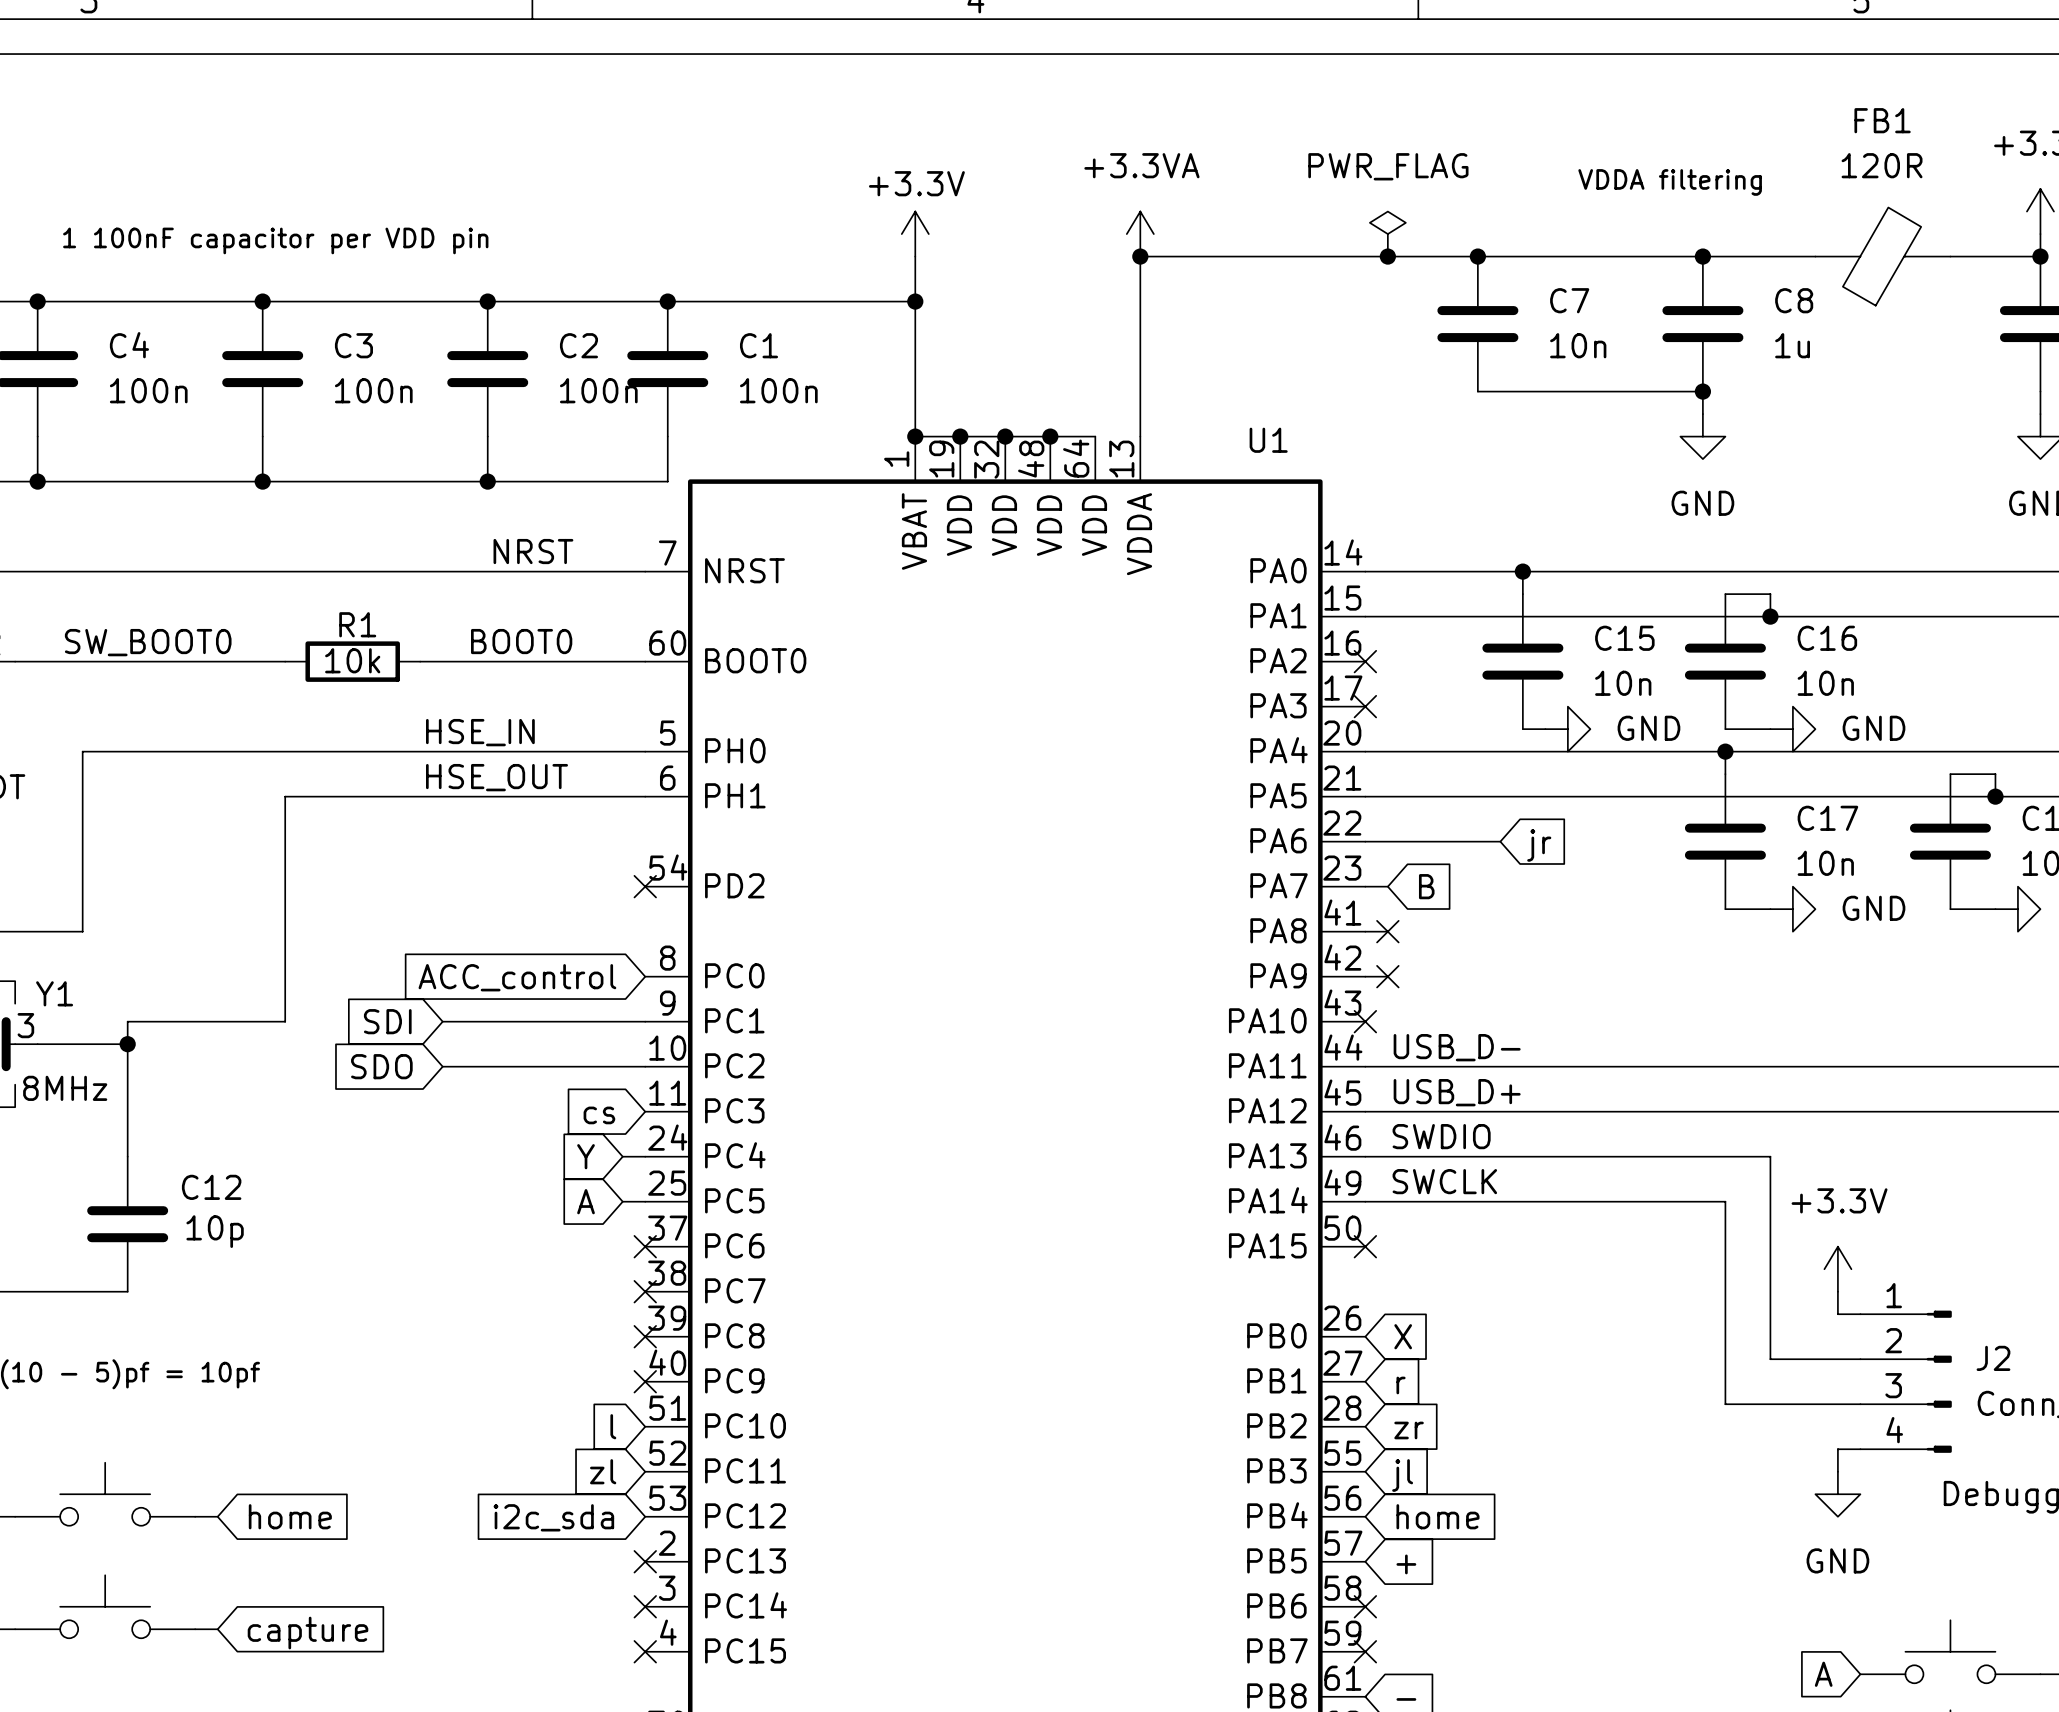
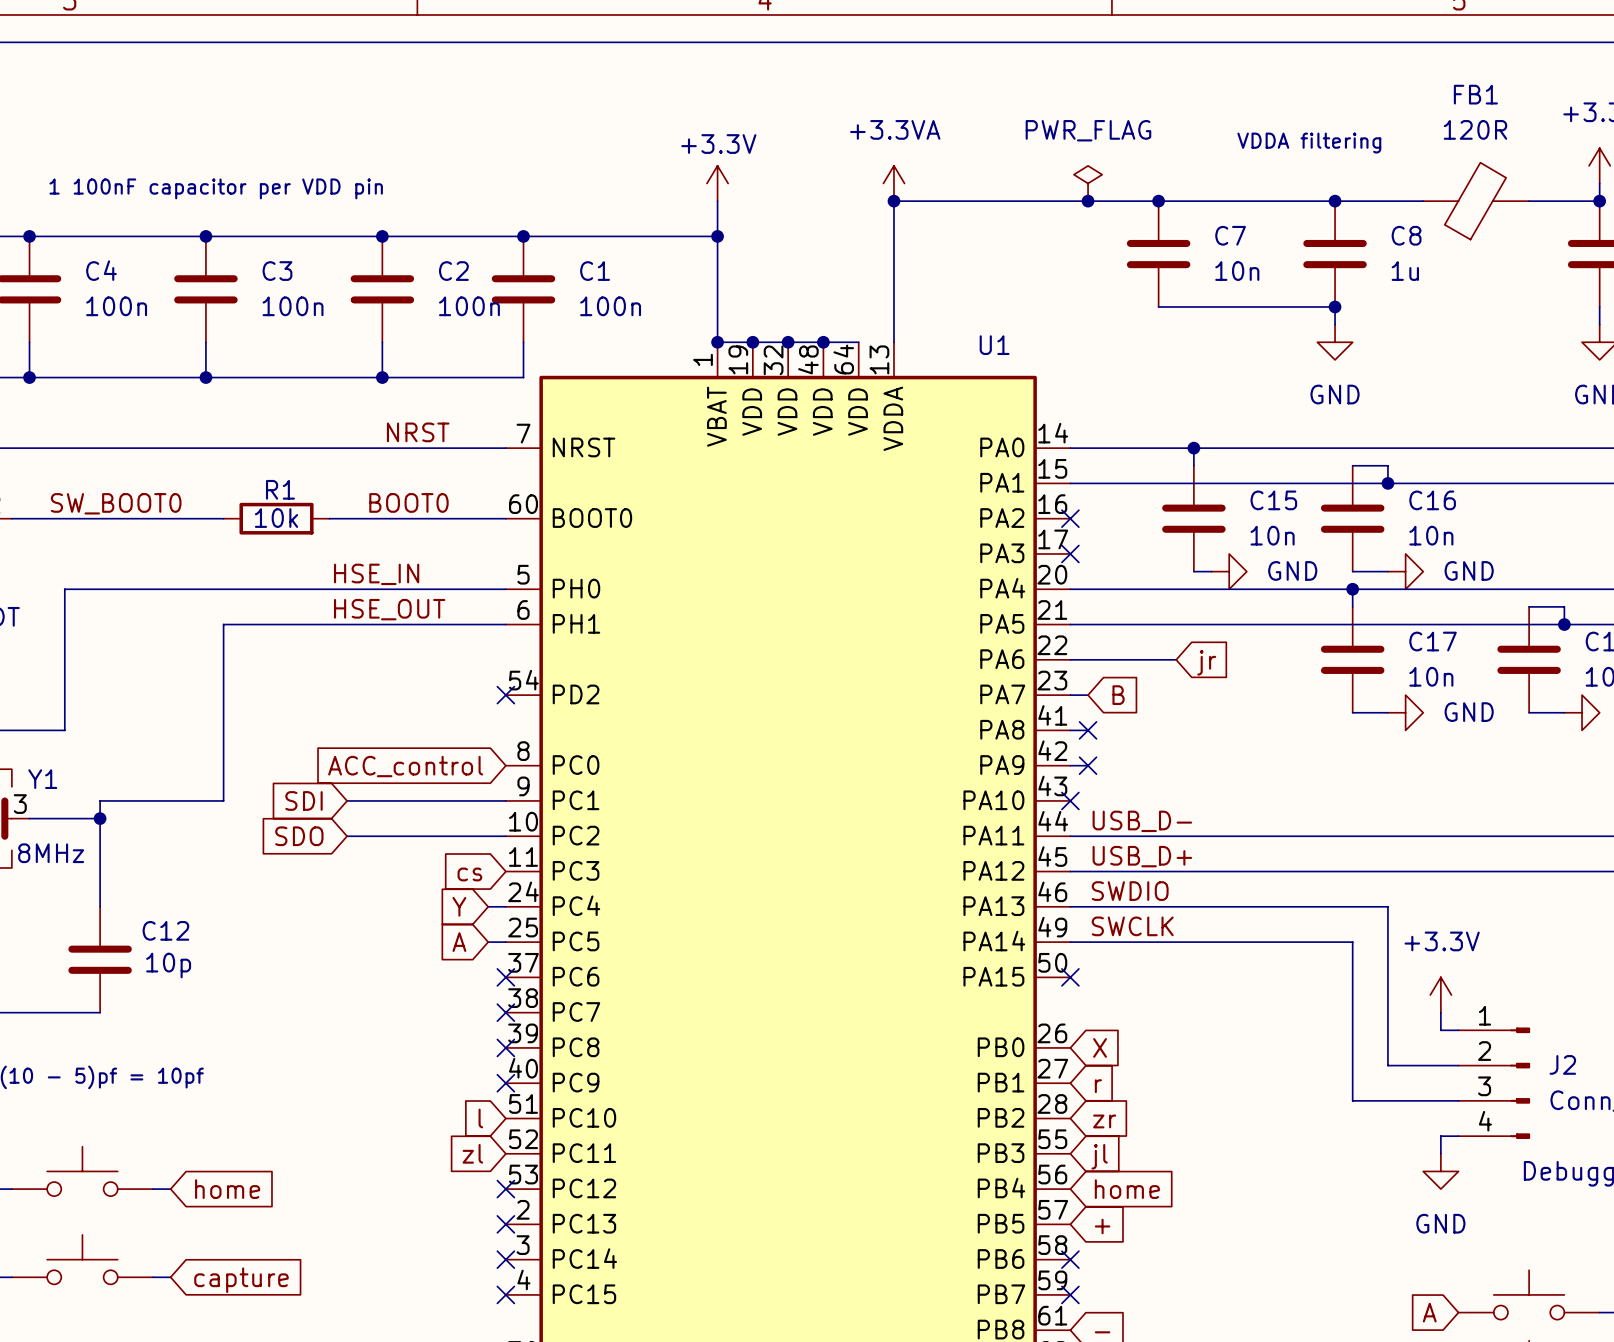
no-connect mark: none -> (505, 1189)
global label: i2c_sda (553, 1517) -> none

